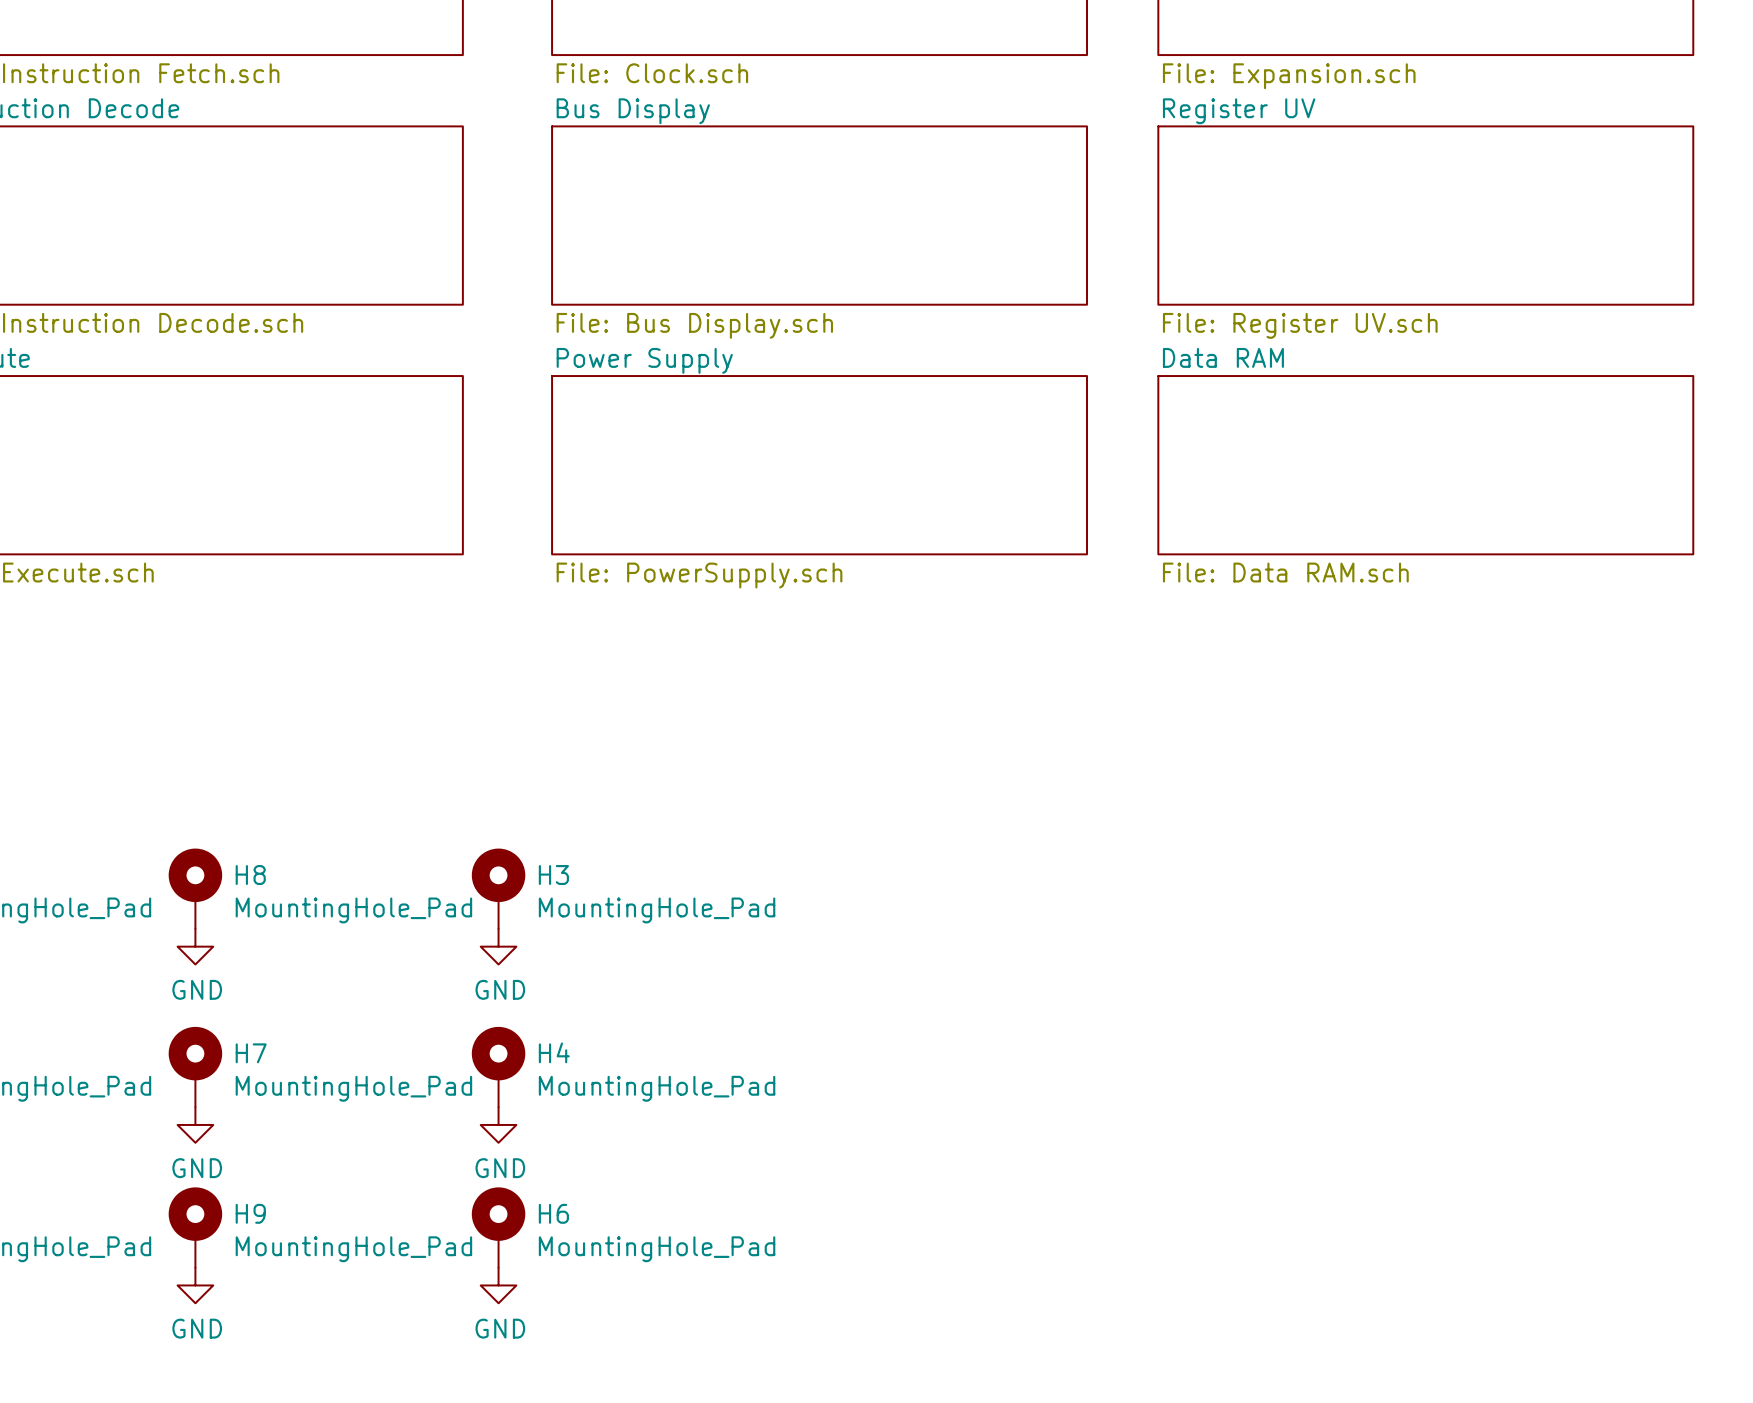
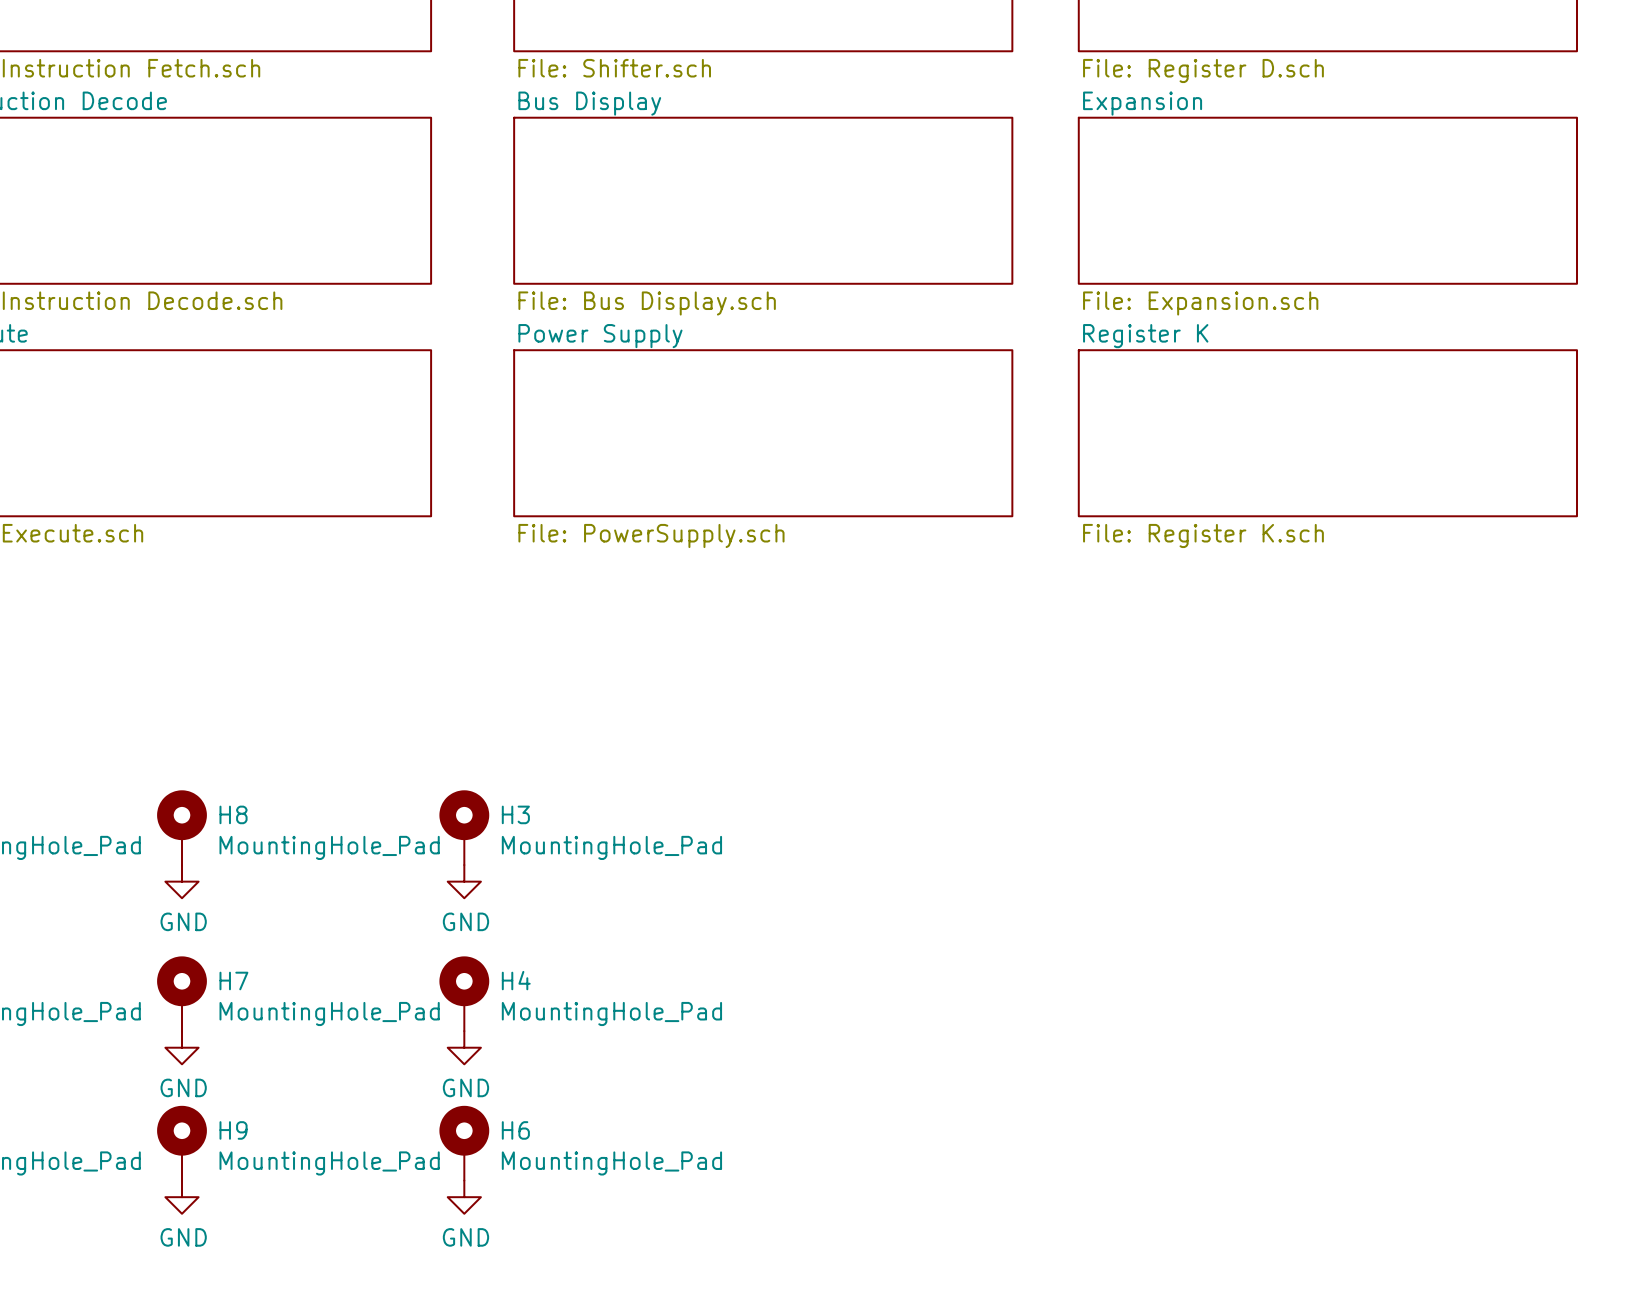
sheet value: File: Clock.sch (652, 73) -> File: Shifter.sch (614, 68)
sheet value: File: Expansion.sch (1289, 76) -> File: Register D.sch (1203, 70)
sheet Register UV name: Register UV (1239, 111) -> Expansion (1142, 103)
sheet Register UV value: File: Register UV.sch (1300, 325) -> File: Expansion.sch (1200, 303)
sheet Data RAM name: Data RAM (1223, 357) -> Register K (1145, 336)
sheet Data RAM value: File: Data RAM.sch (1285, 572) -> File: Register K.sch (1203, 535)

